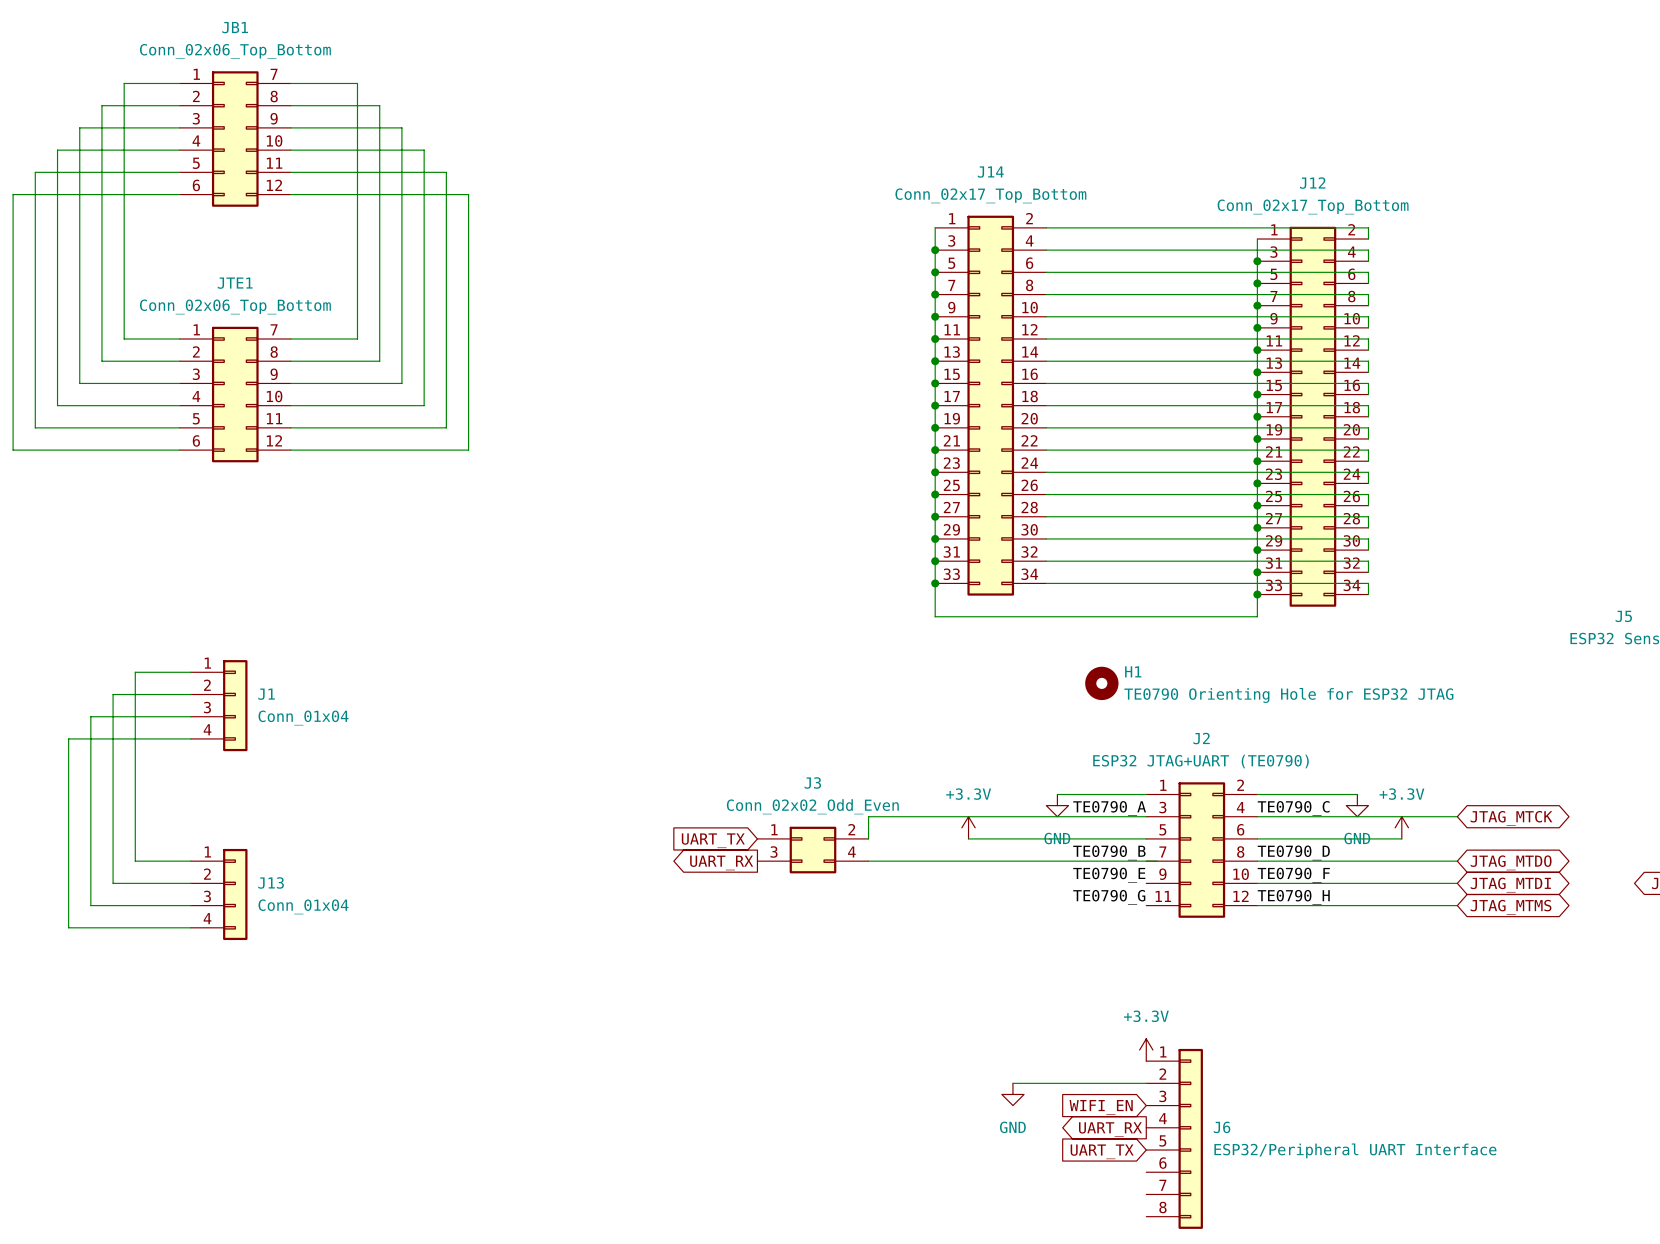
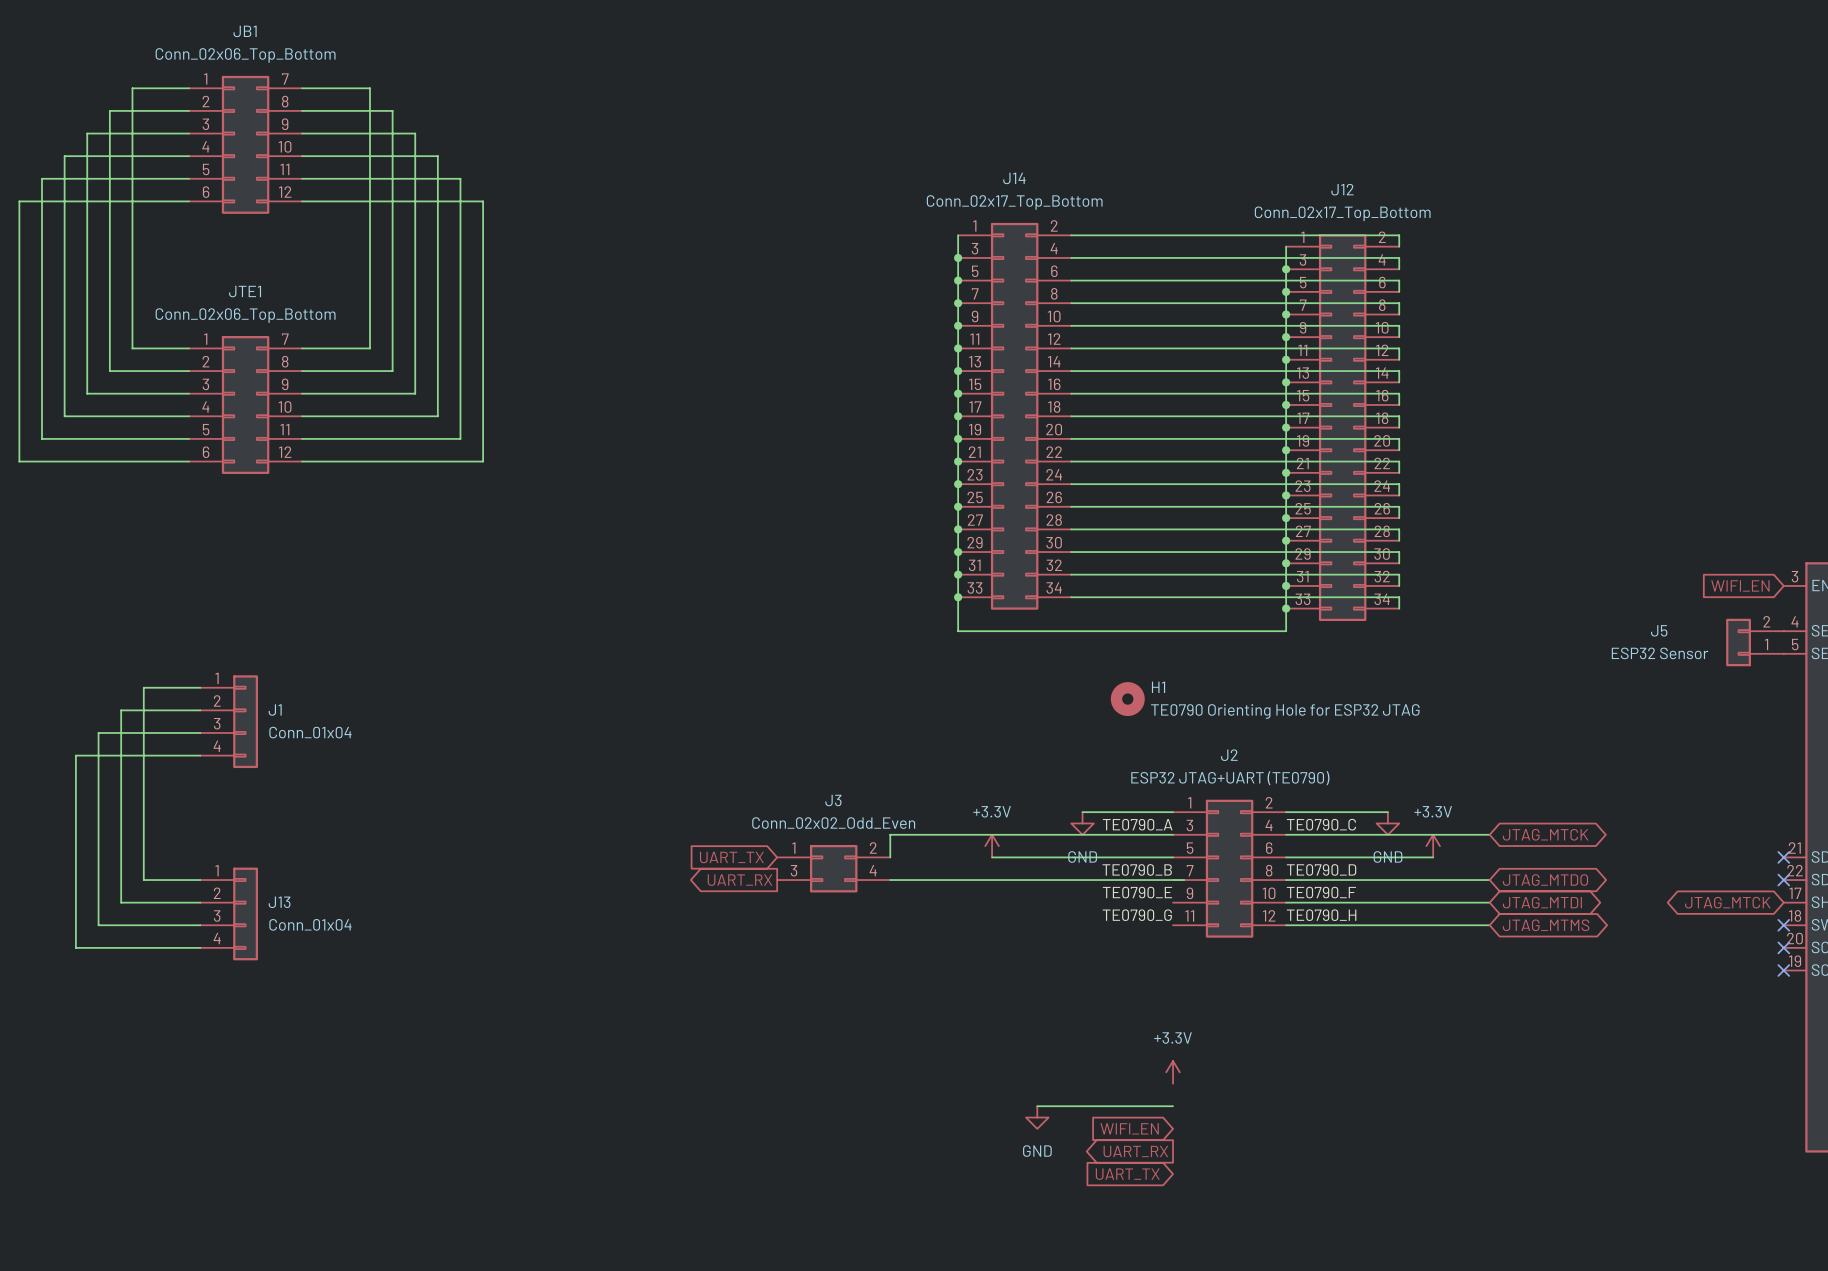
J6: ESP32/Peripheral UART Interface (1174, 1138) -> none

